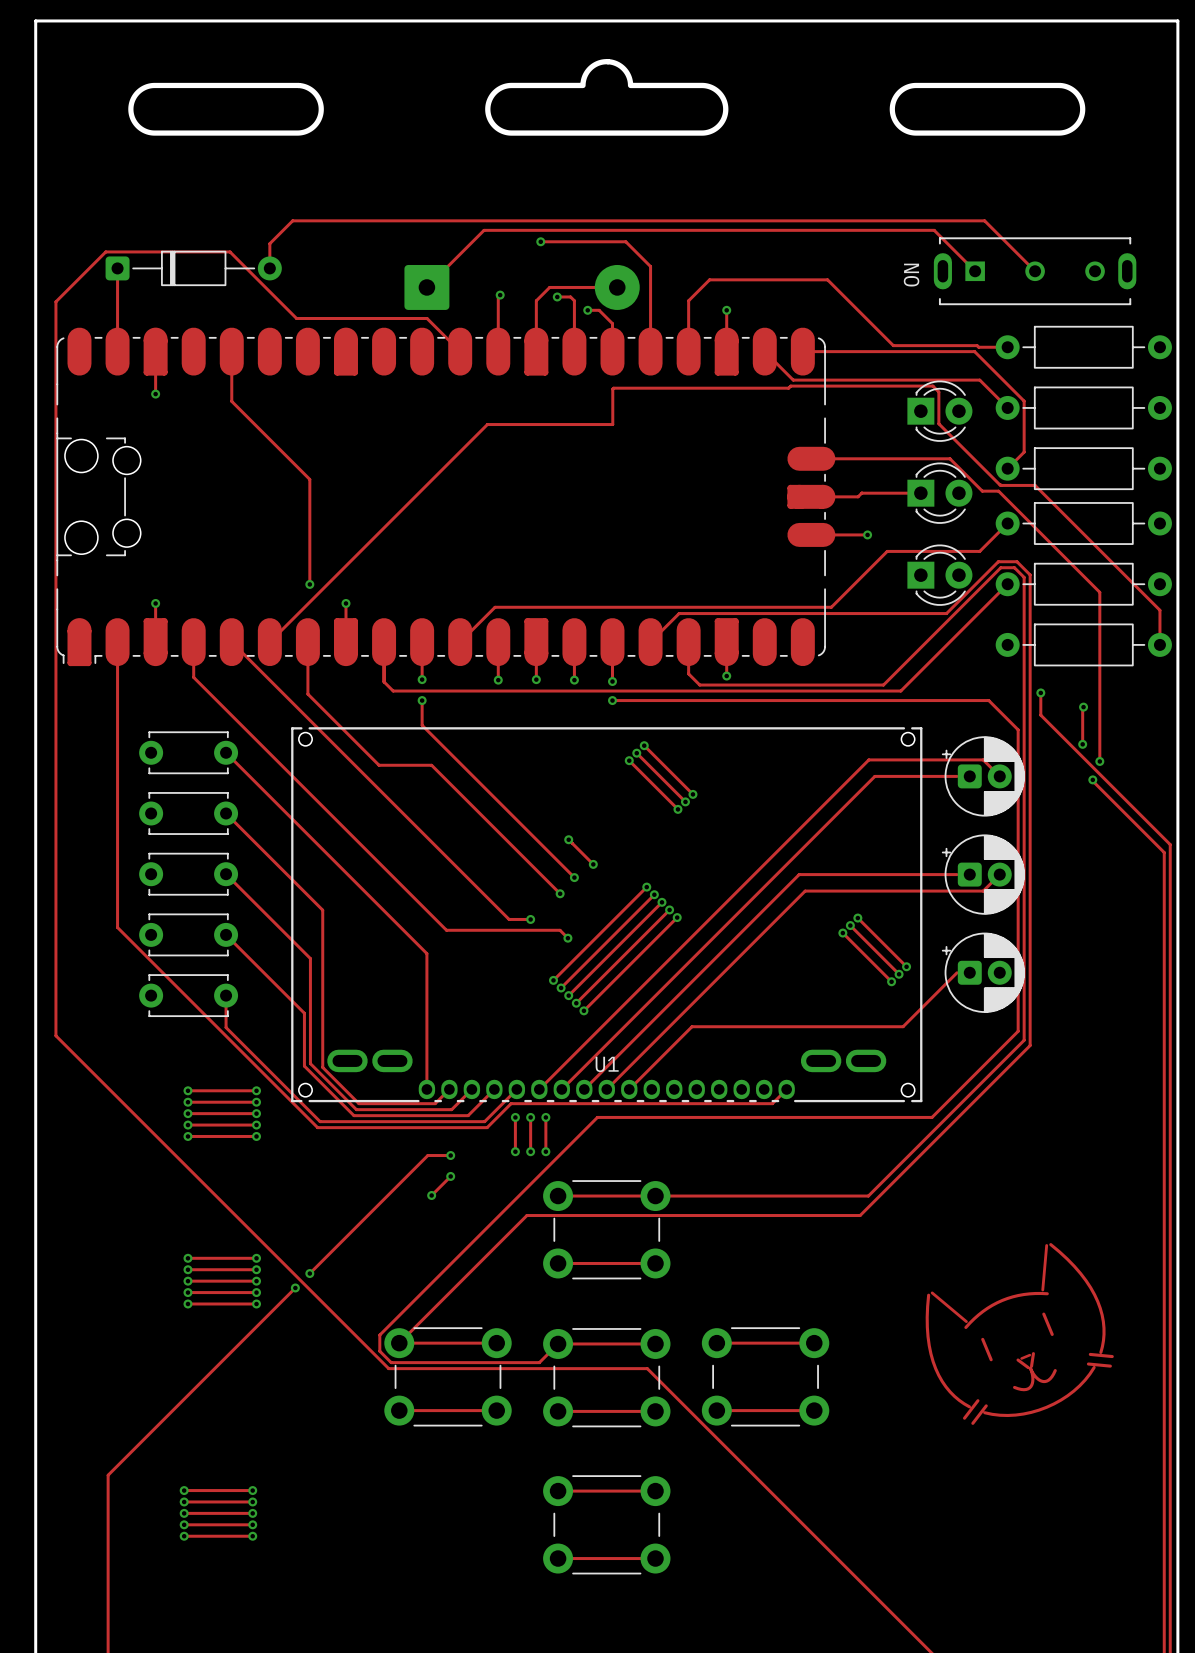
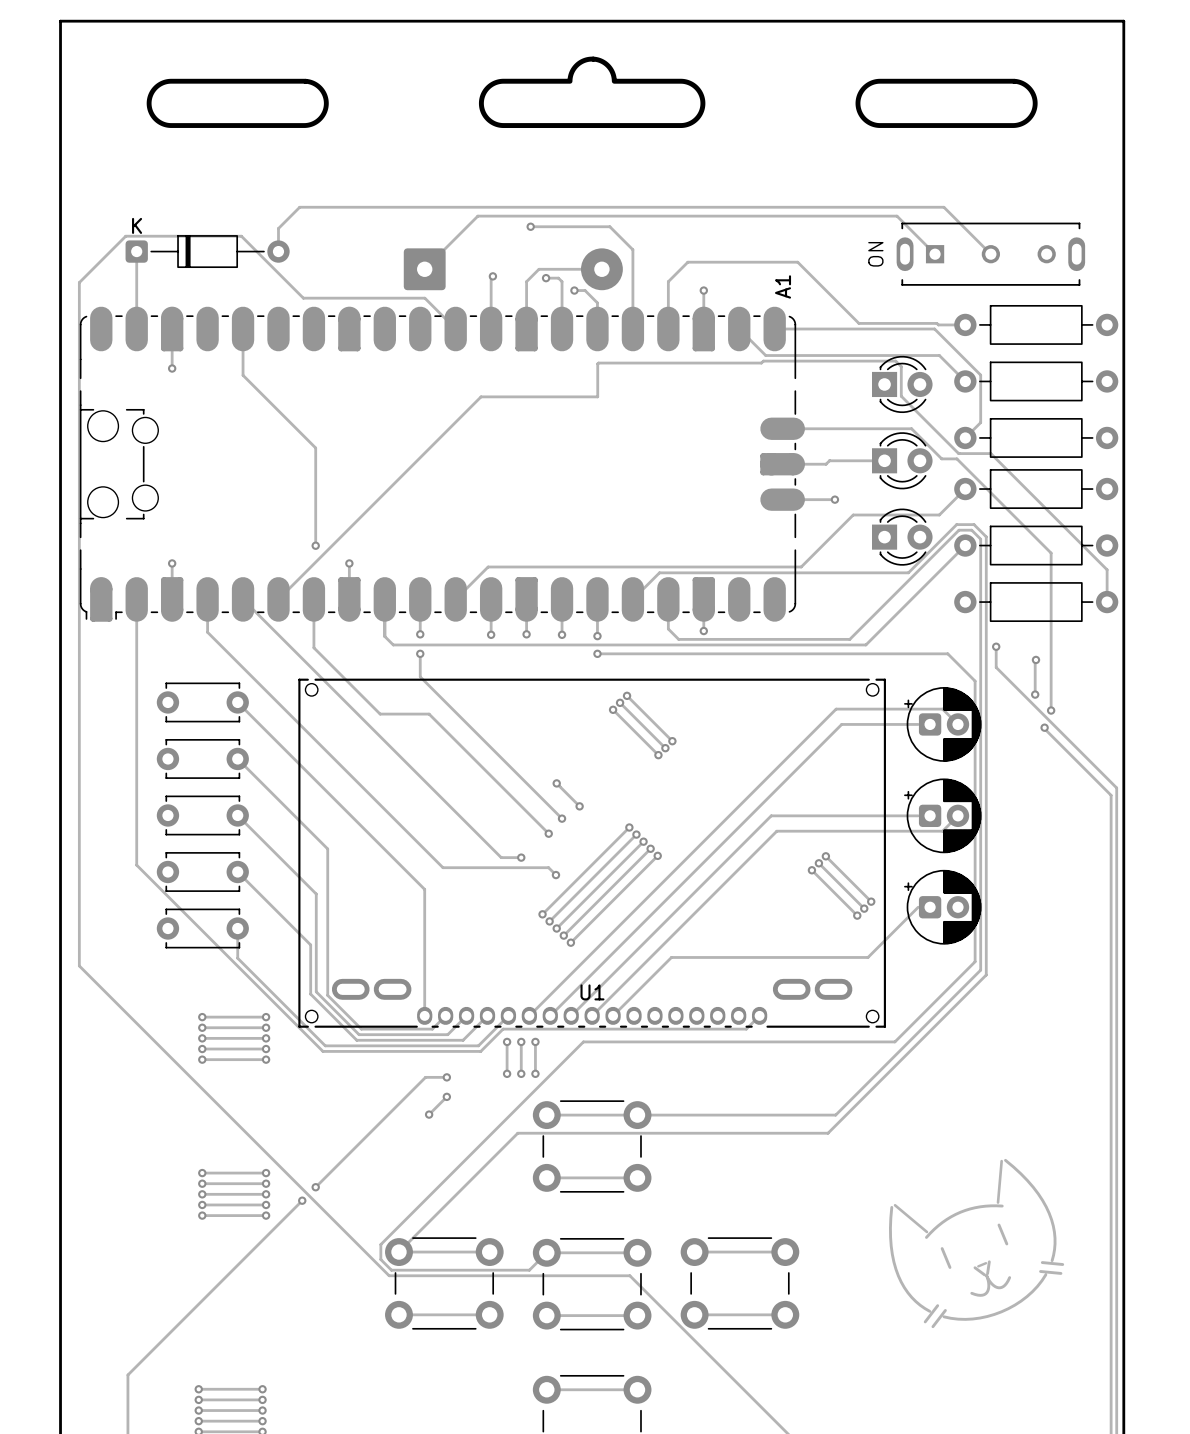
part text: none -> K (137, 225)
A1 name: none -> A1 (783, 286)

